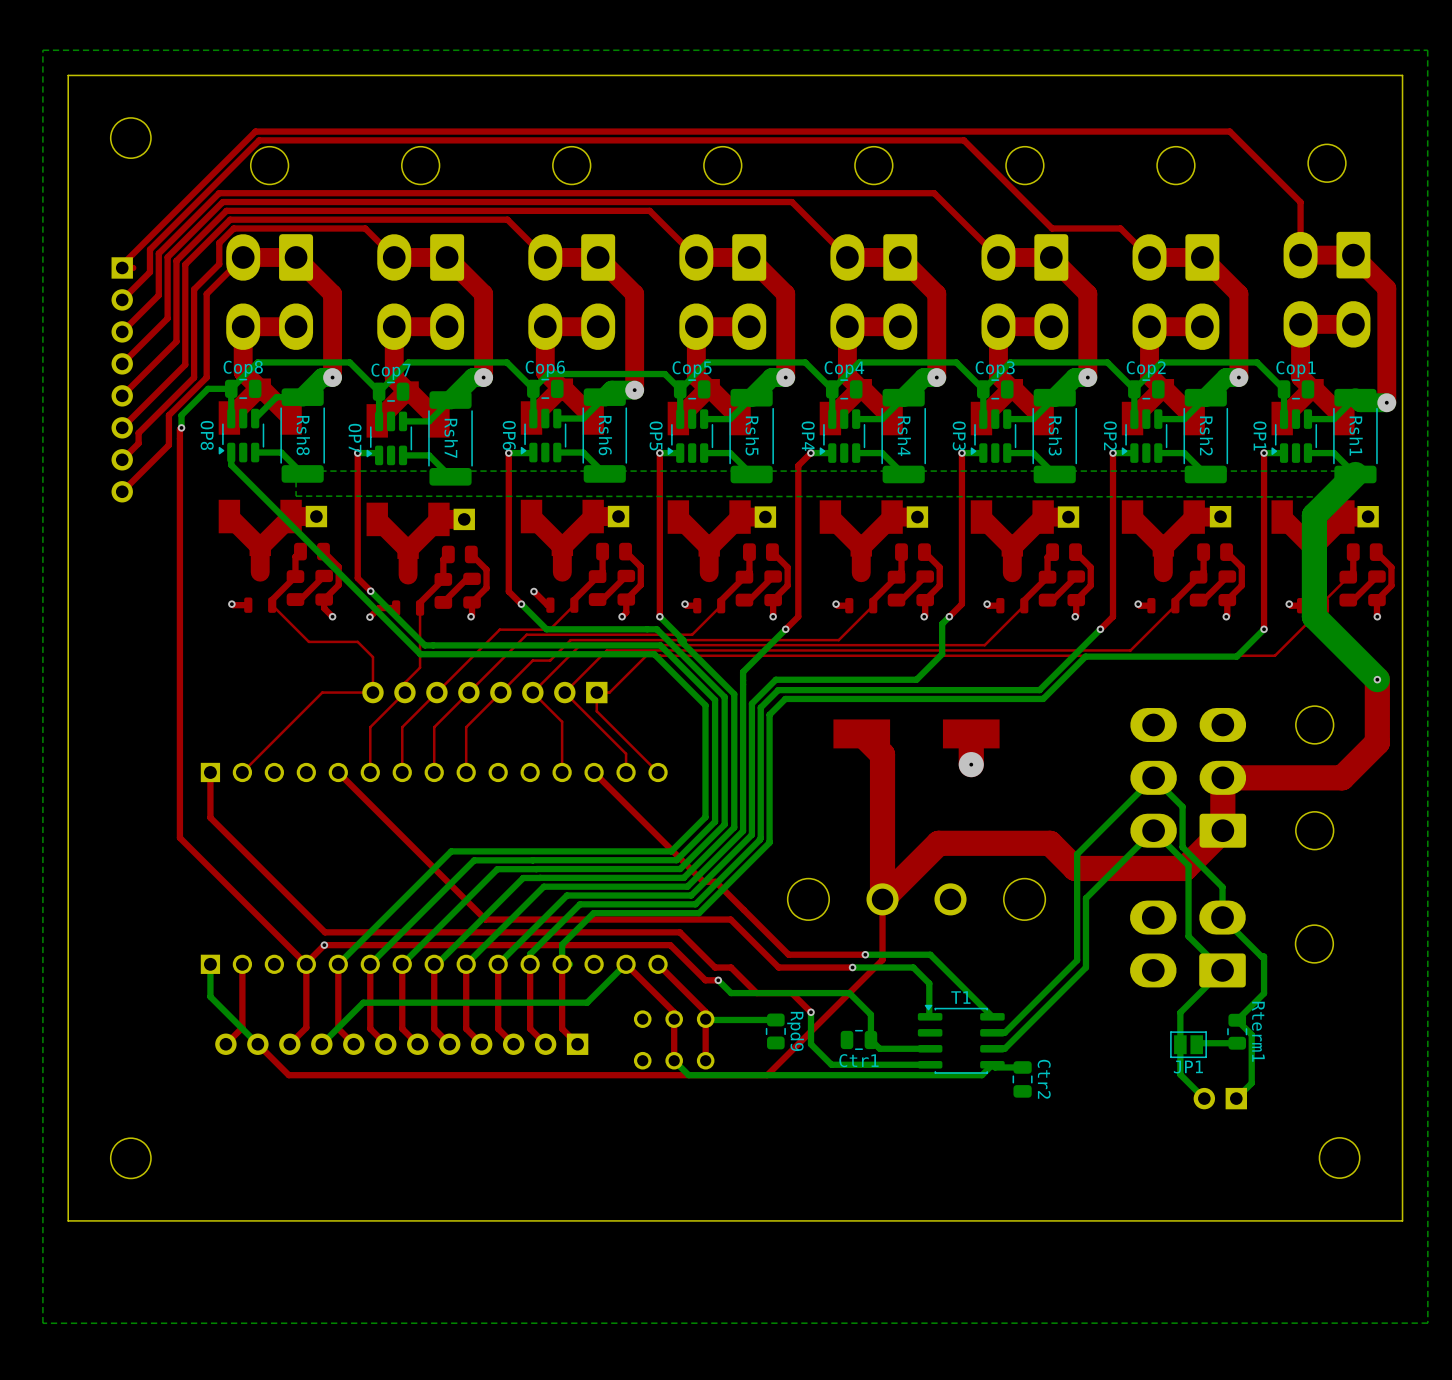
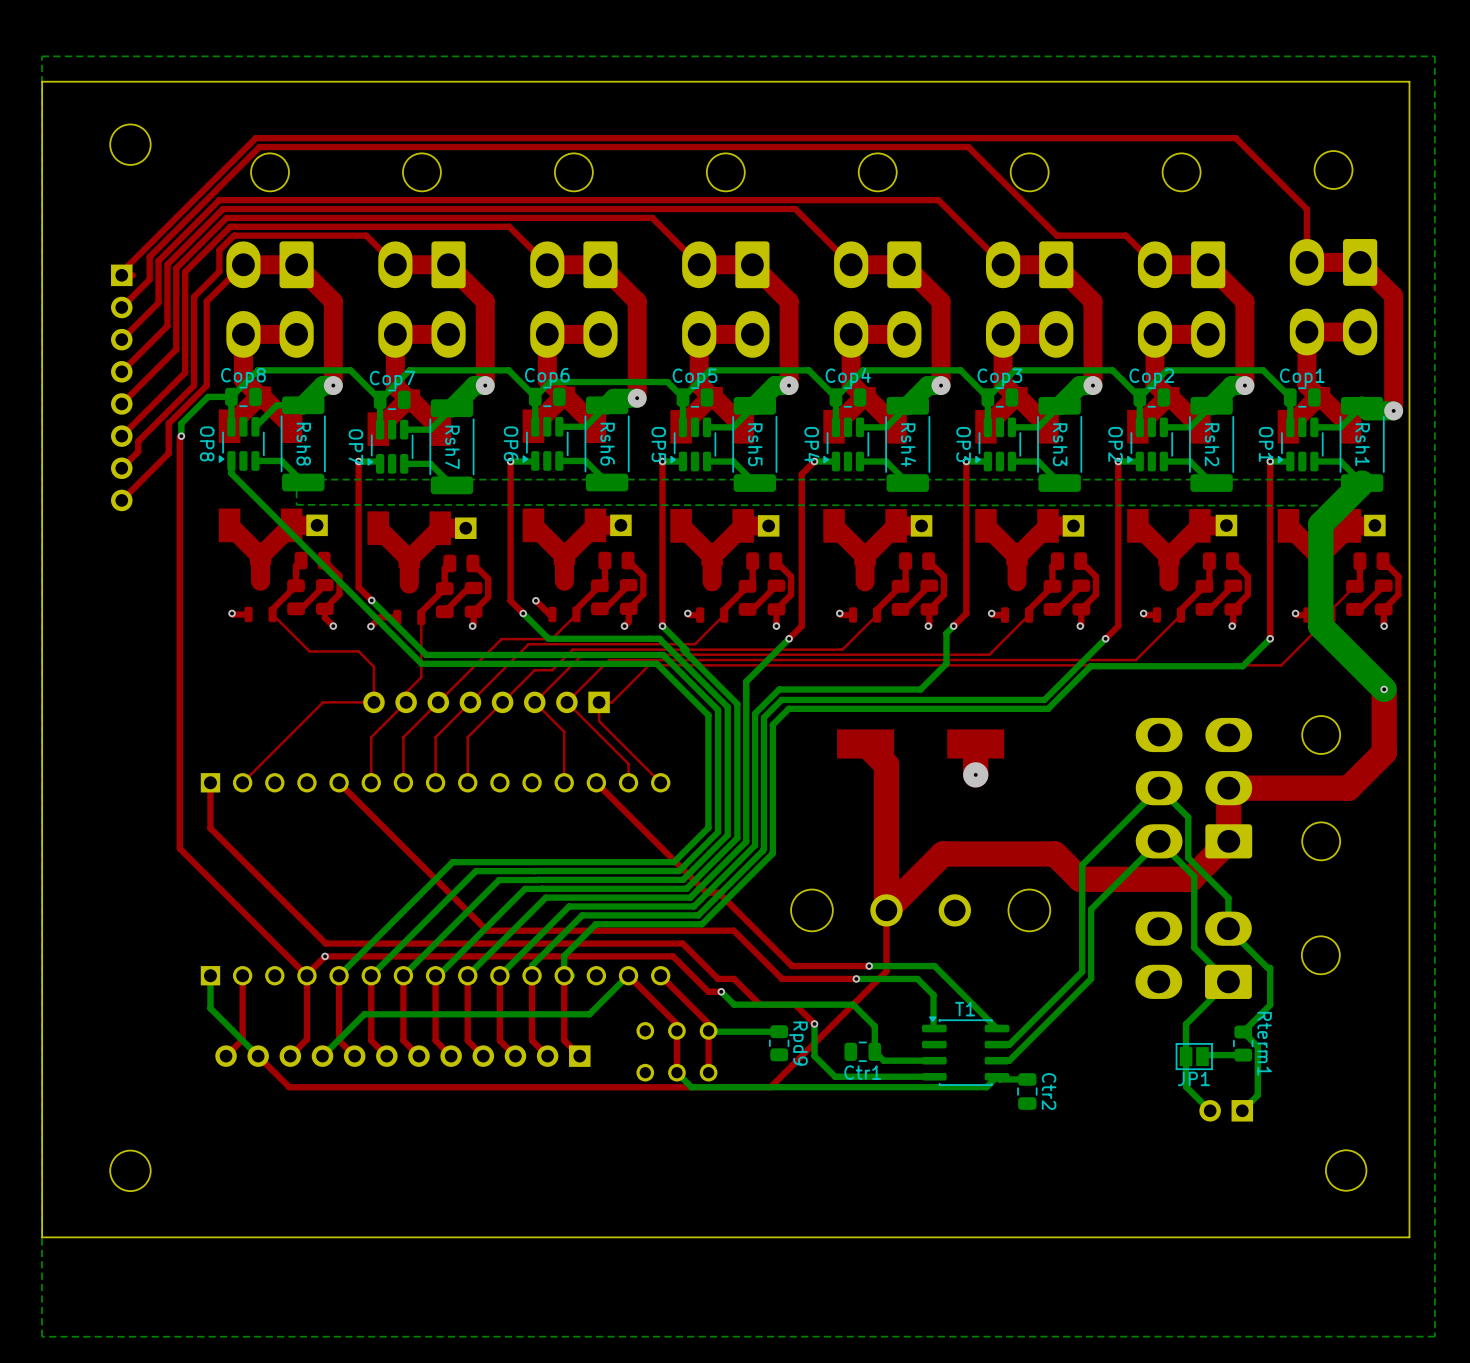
board edge: (68, 75) (68, 1220) (1402, 1220) -> (67, 81) (42, 81) (42, 1237) (1409, 1237) (1409, 1233)

